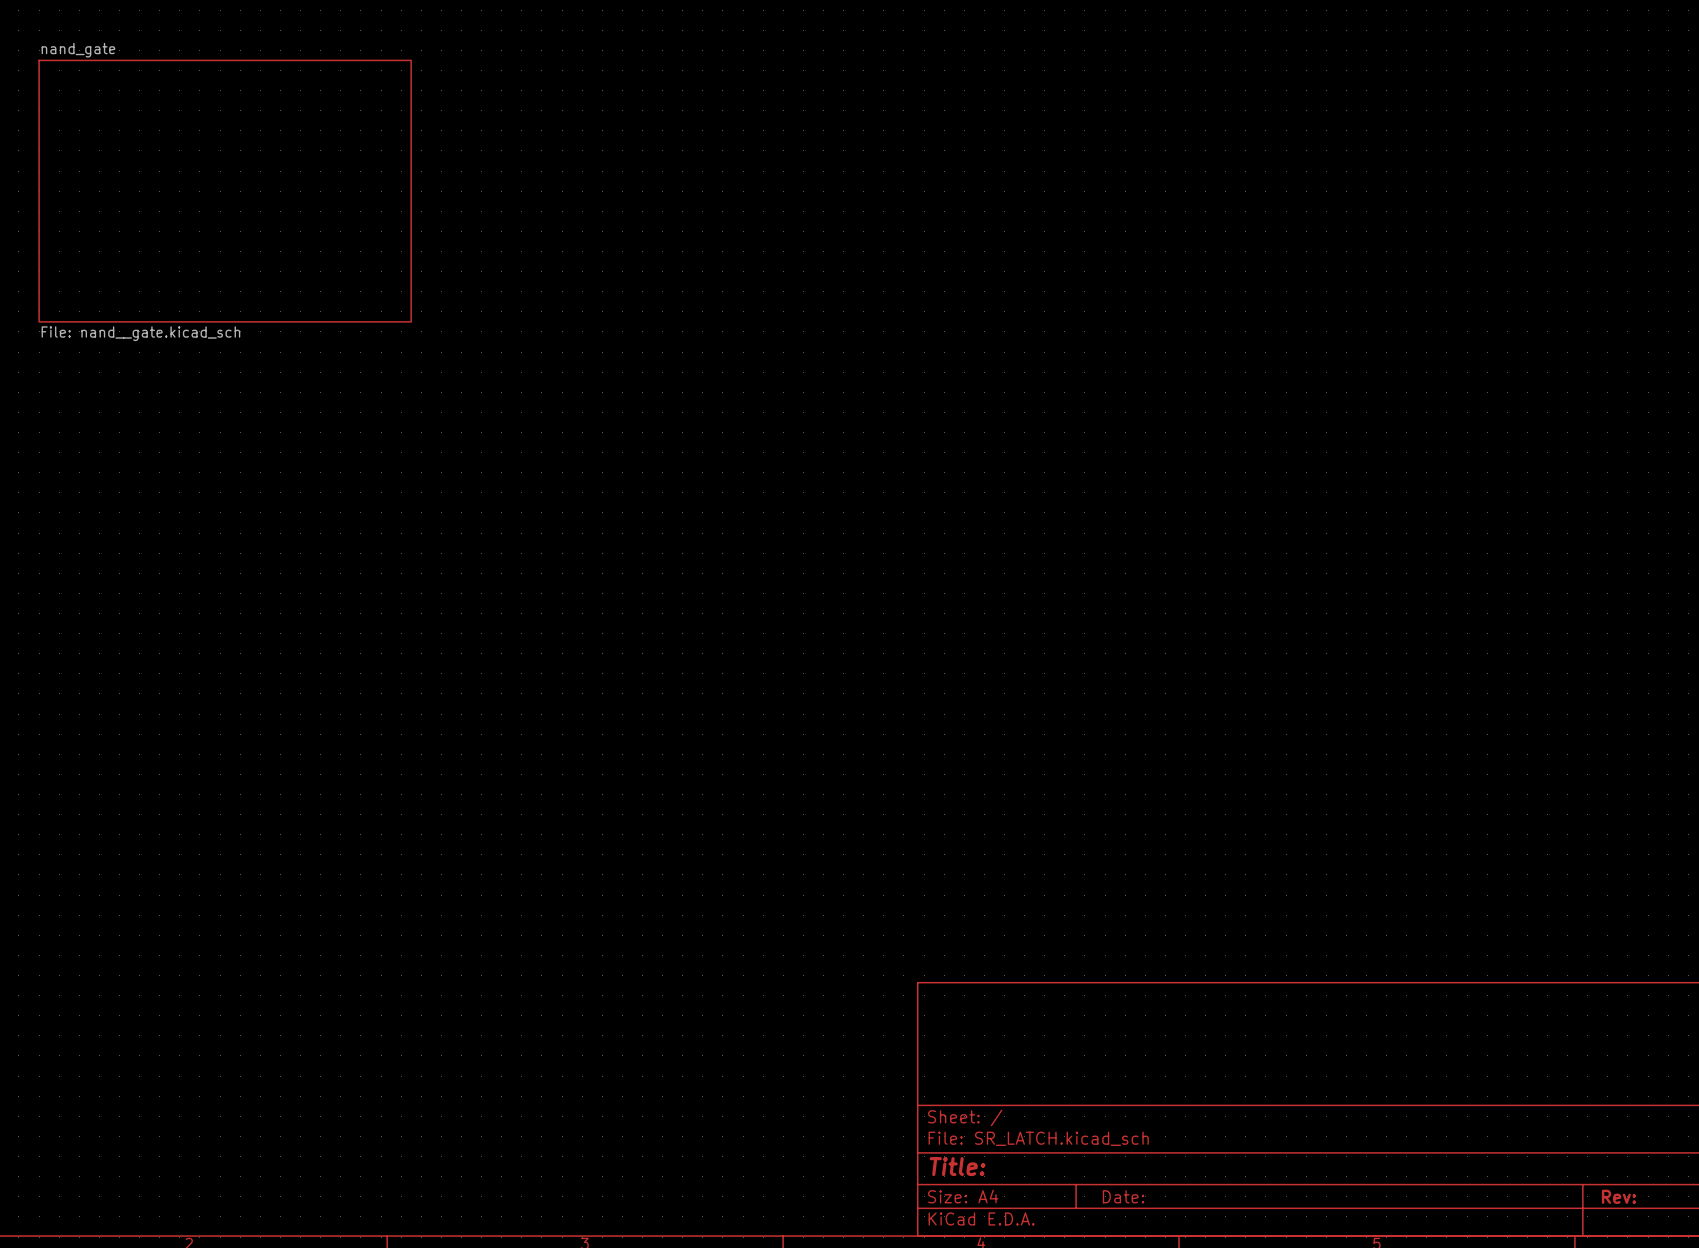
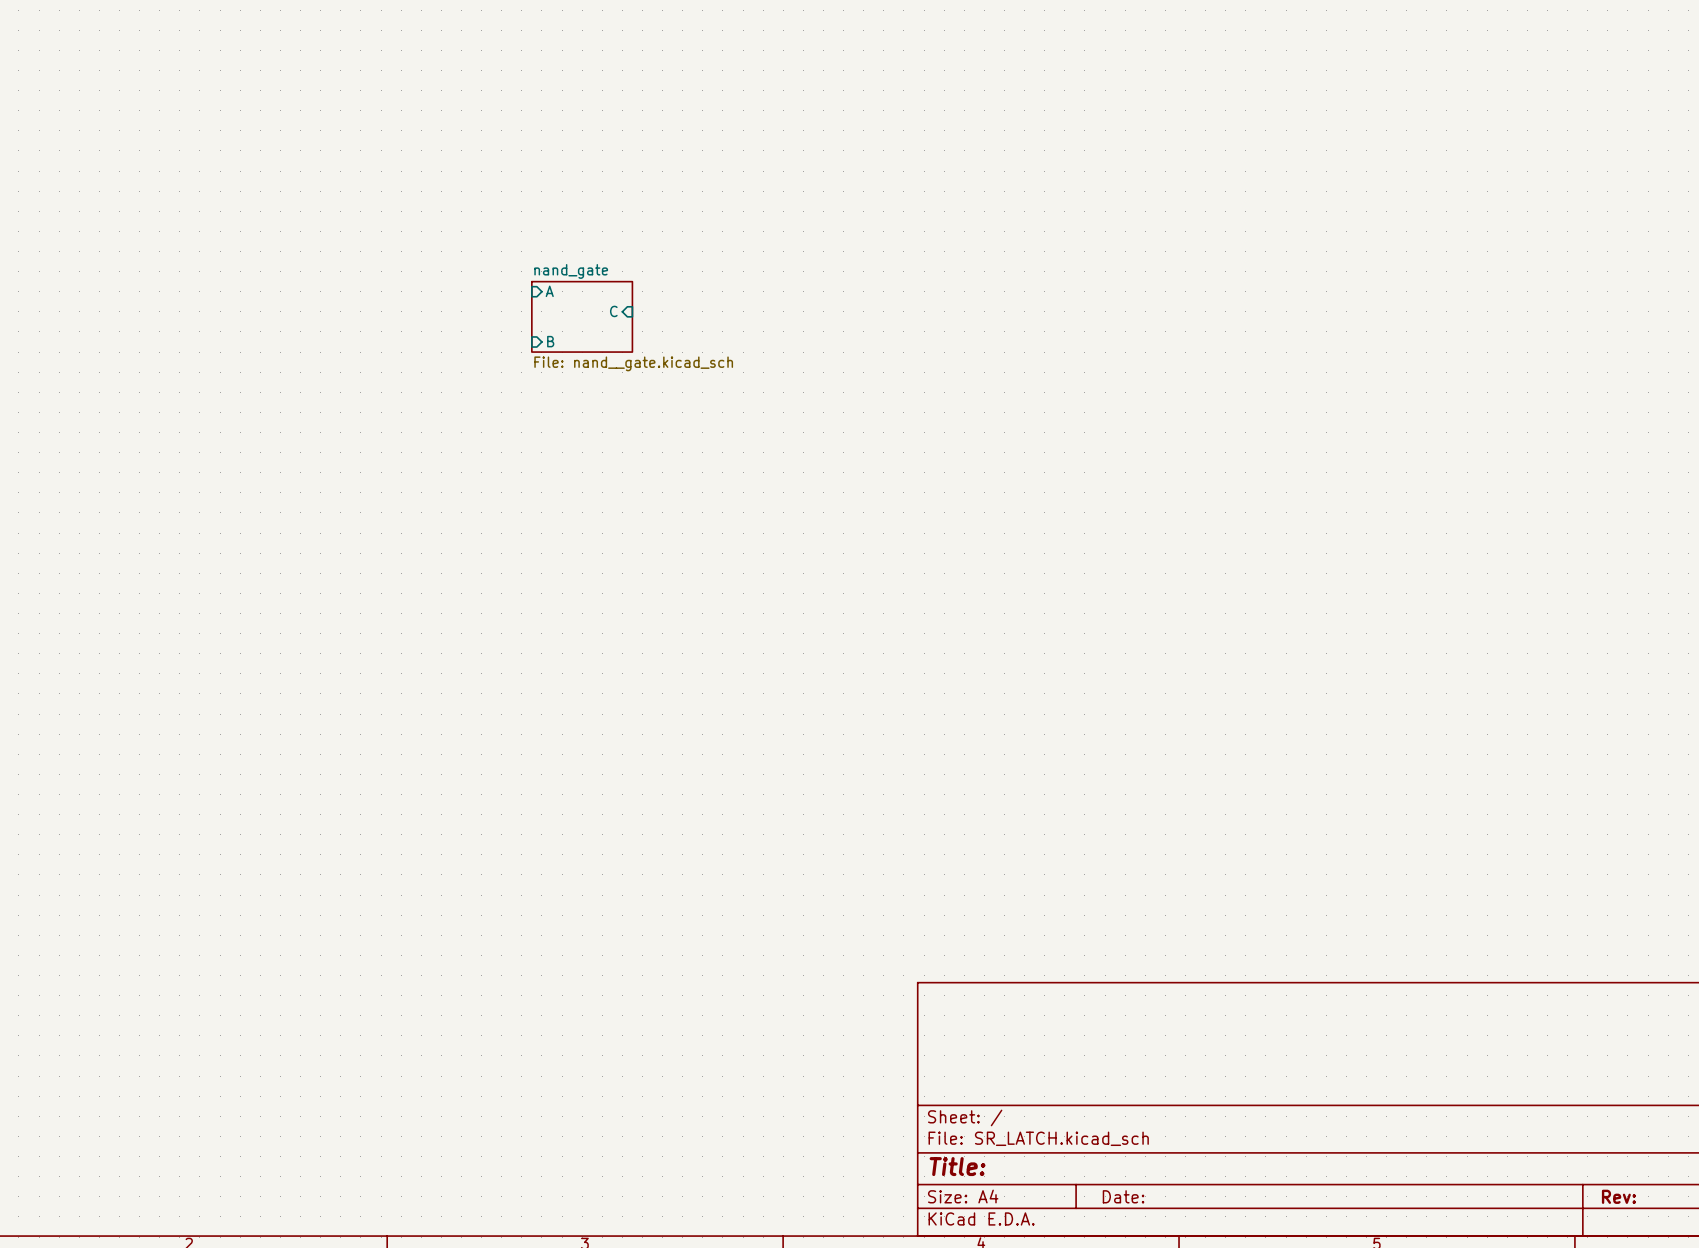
sheet nand_gate: File: nand__gate.kicad_sch (225, 191) -> none
sheet pin: none -> A (549, 291)
sheet pin: none -> C (613, 311)
sheet nand_gate: none -> File: nand__gate.kicad_sch (582, 316)
sheet pin: none -> B (550, 341)

